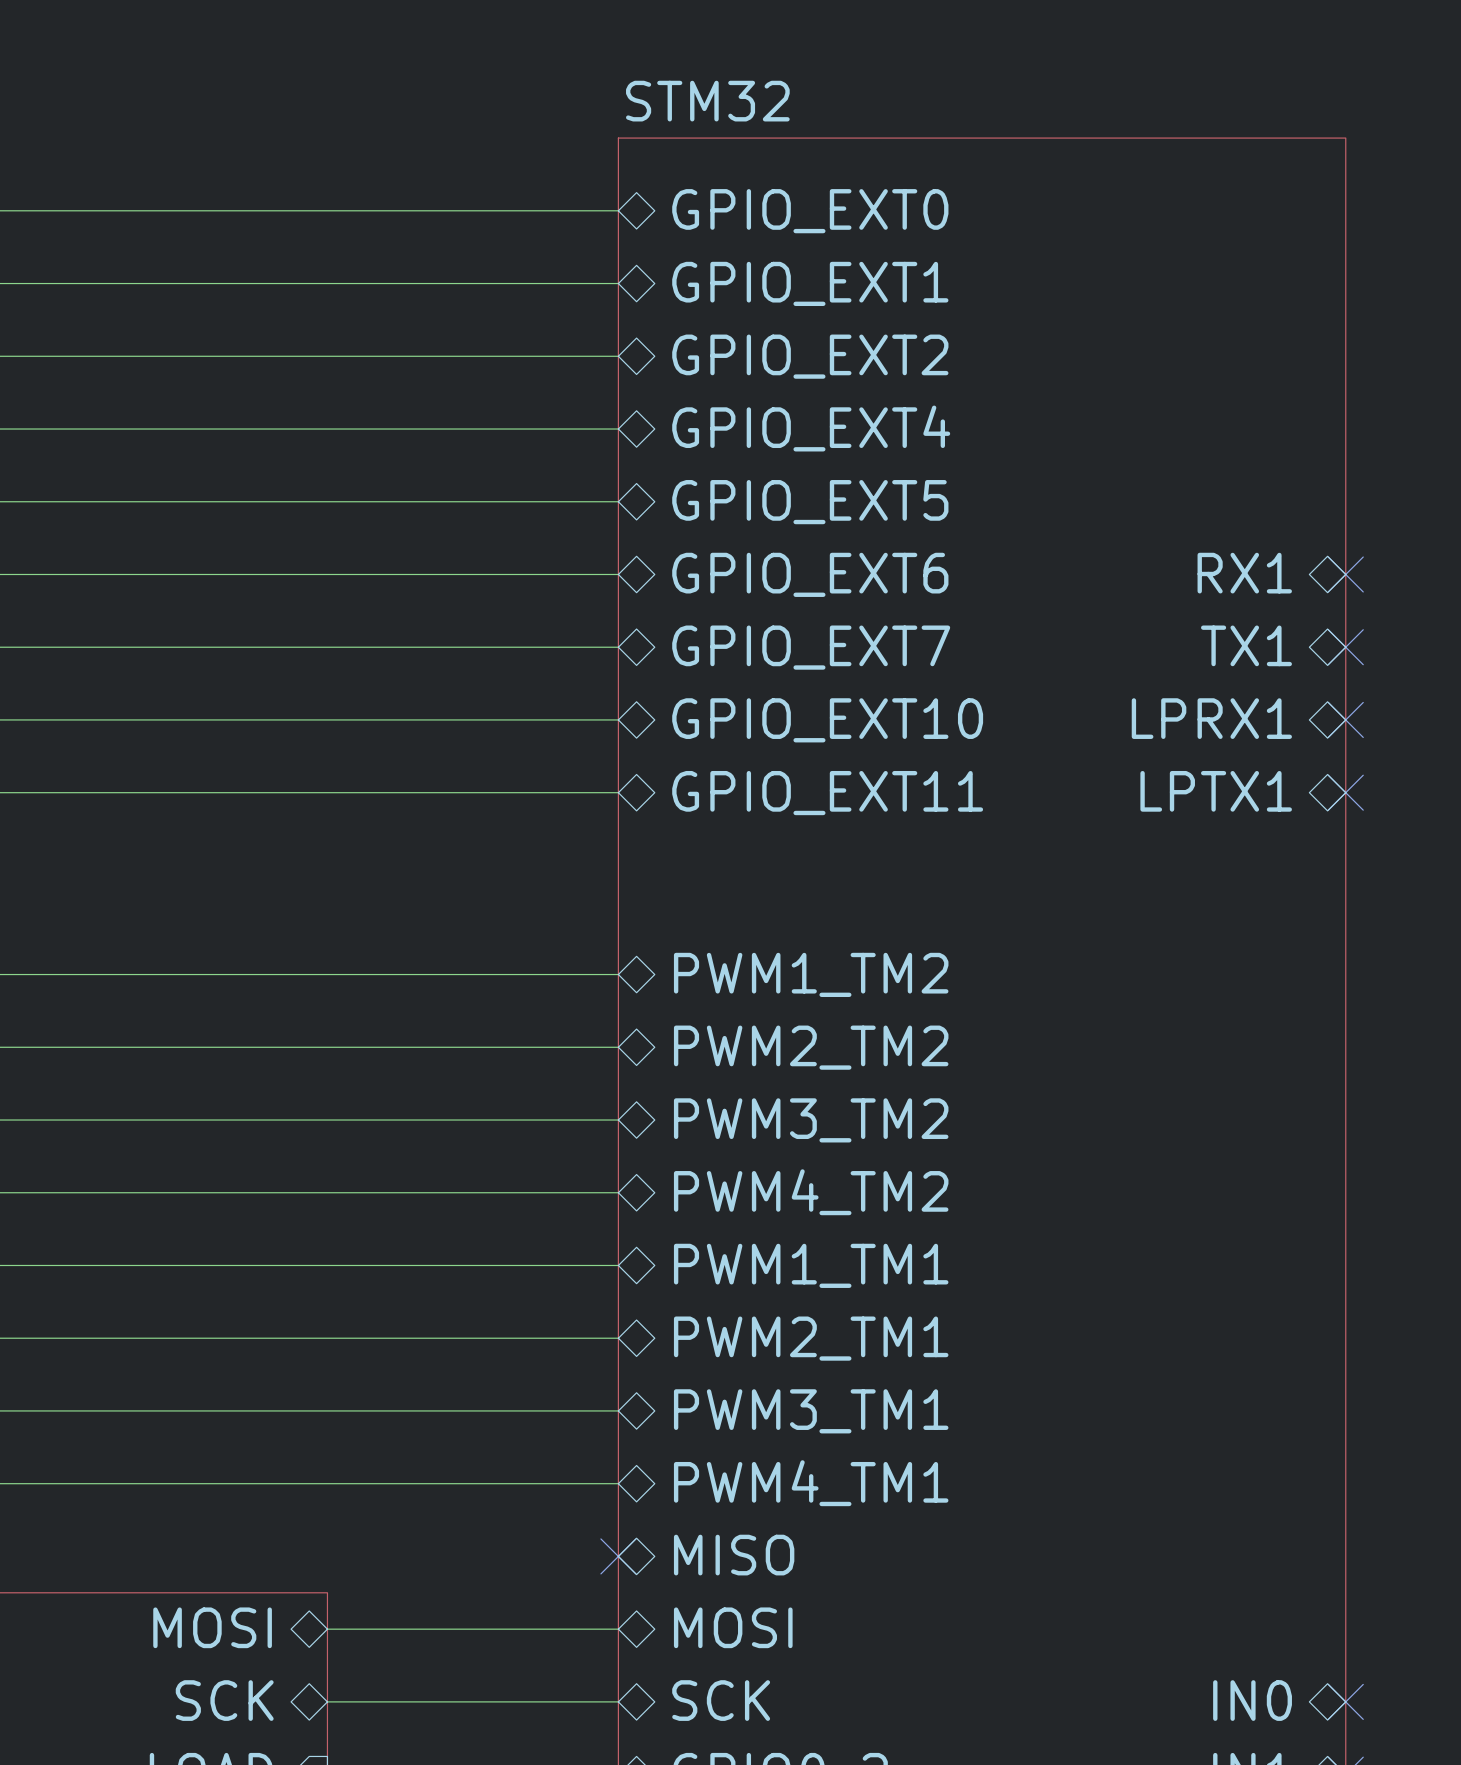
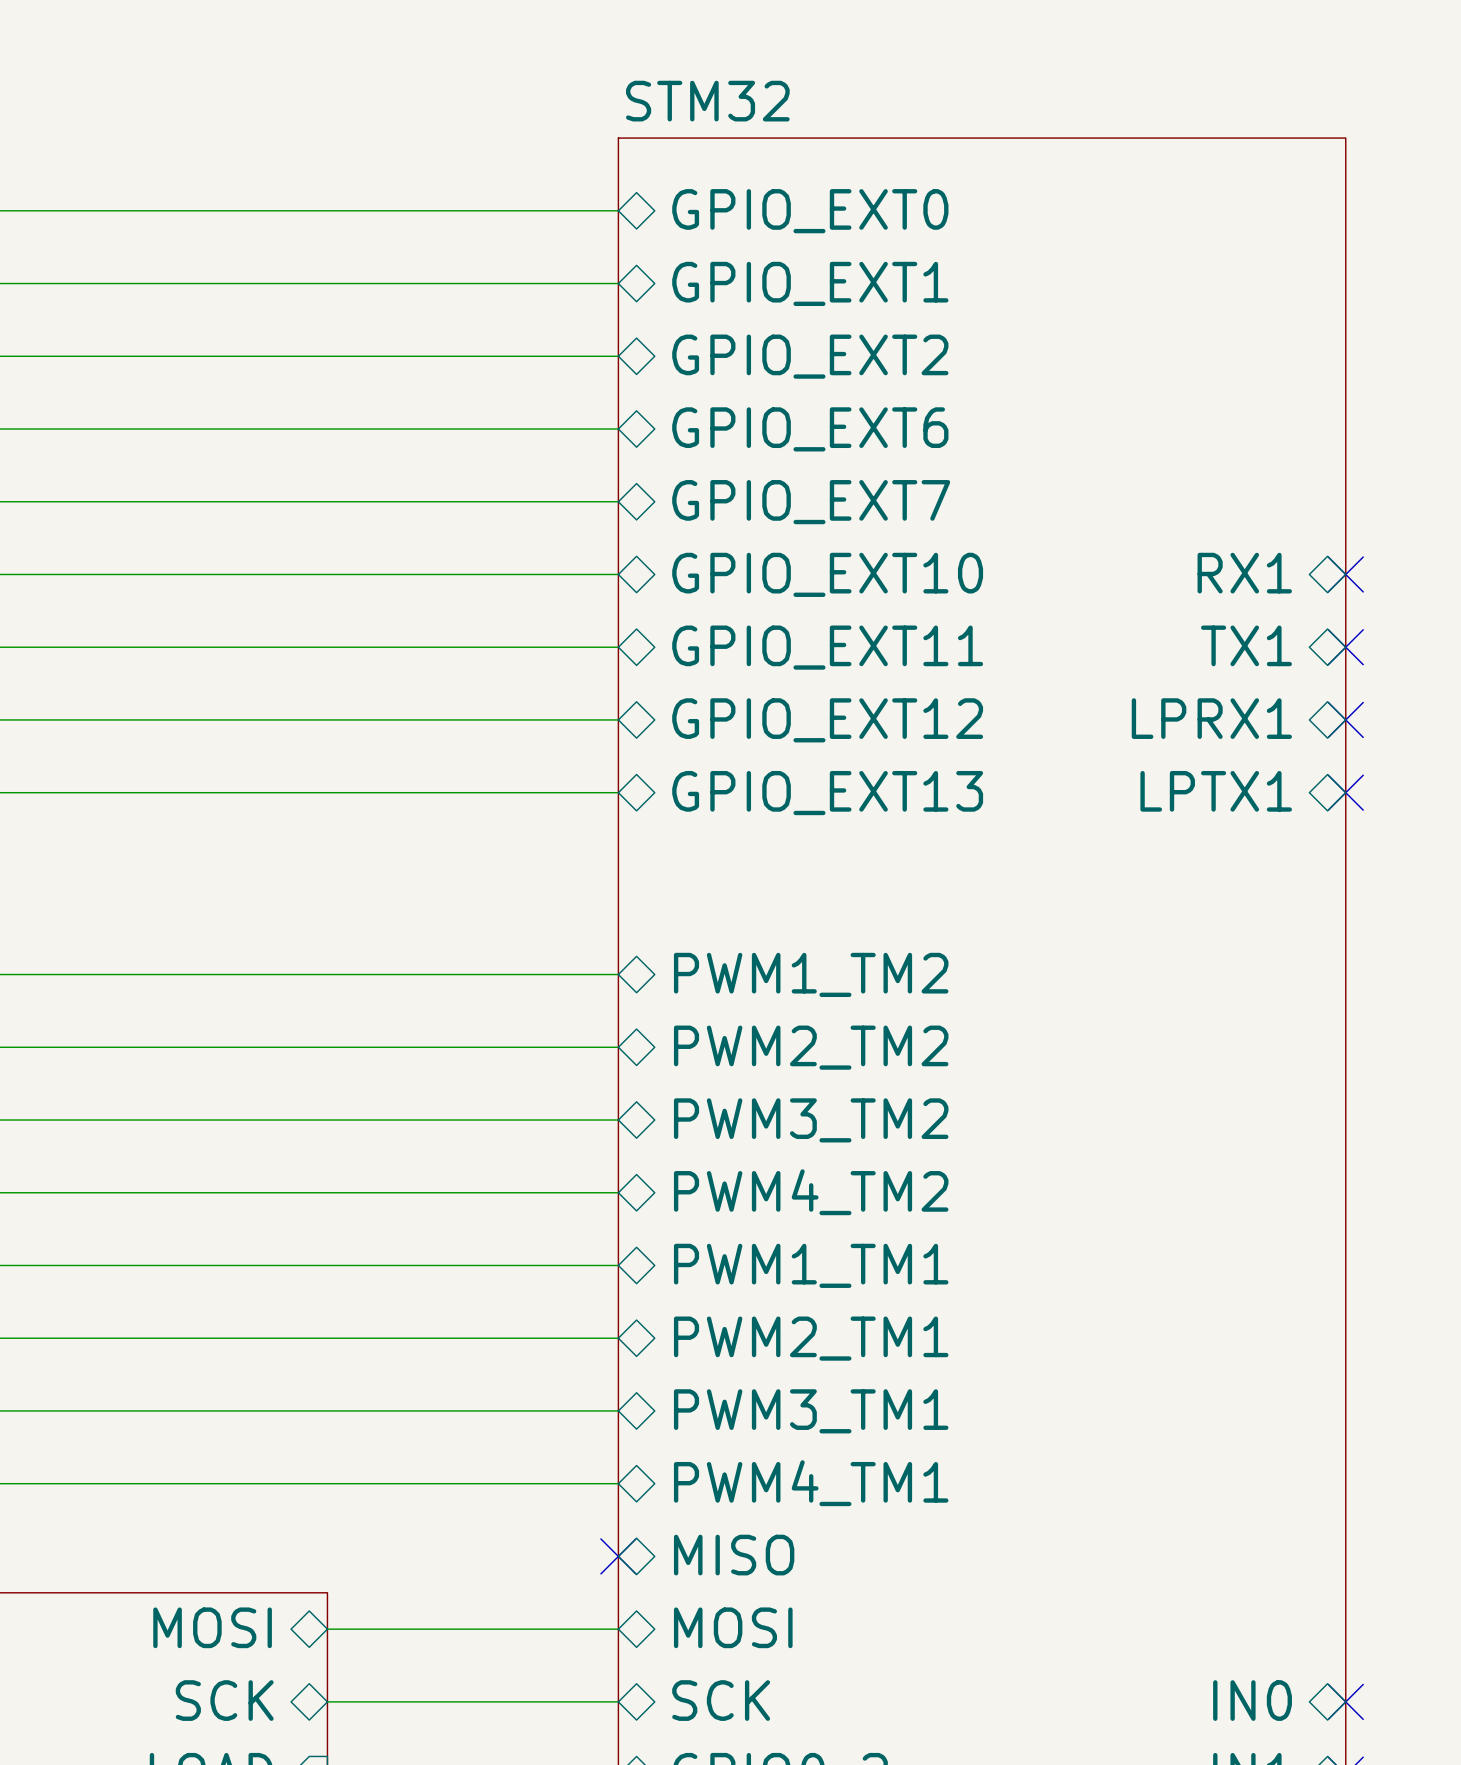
sheet pin: GPIO_EXT4 (811, 428) -> GPIO_EXT6 (810, 429)
sheet pin: GPIO_EXT5 (810, 502) -> GPIO_EXT7 (811, 502)
sheet pin: GPIO_EXT6 (810, 574) -> GPIO_EXT10 (827, 574)
sheet pin: GPIO_EXT7 (811, 647) -> GPIO_EXT11 (827, 647)
sheet pin: GPIO_EXT10 (827, 720) -> GPIO_EXT12 (827, 720)
sheet pin: GPIO_EXT11 (827, 793) -> GPIO_EXT13 (827, 793)

